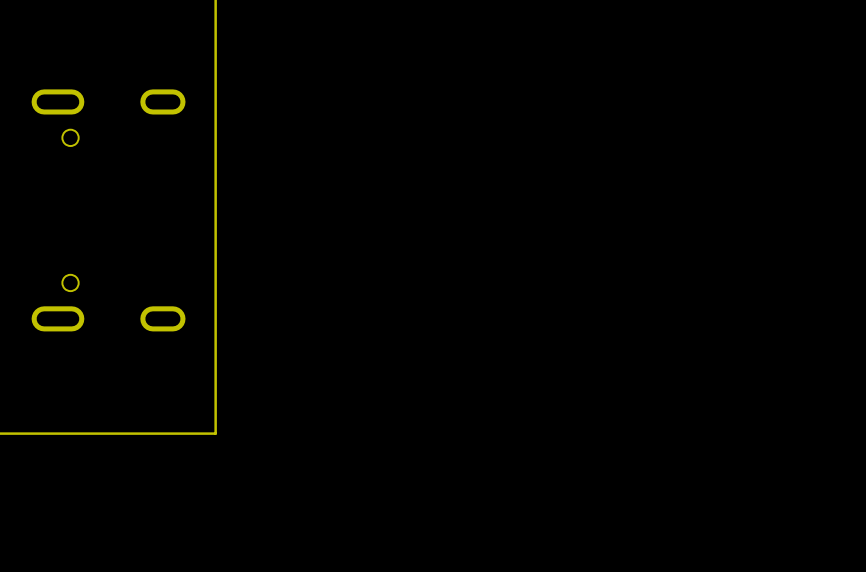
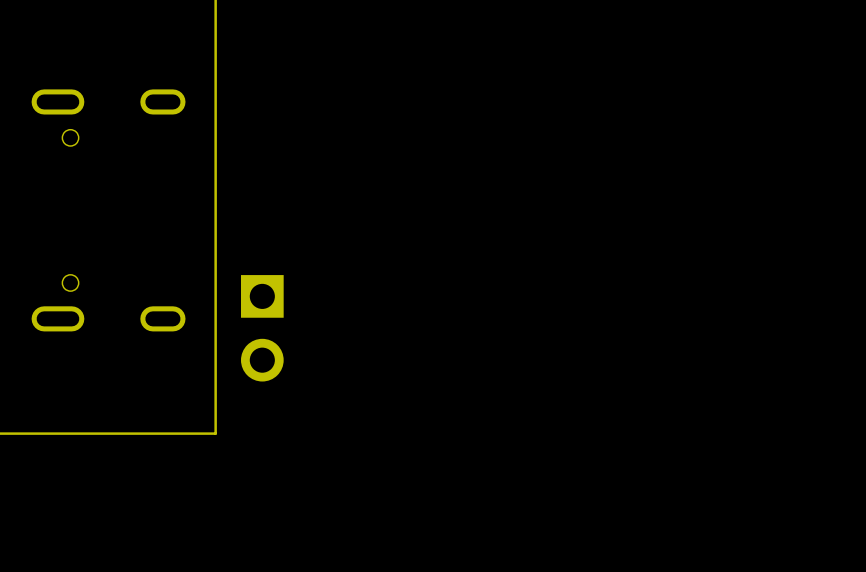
part: none -> (262, 328)

